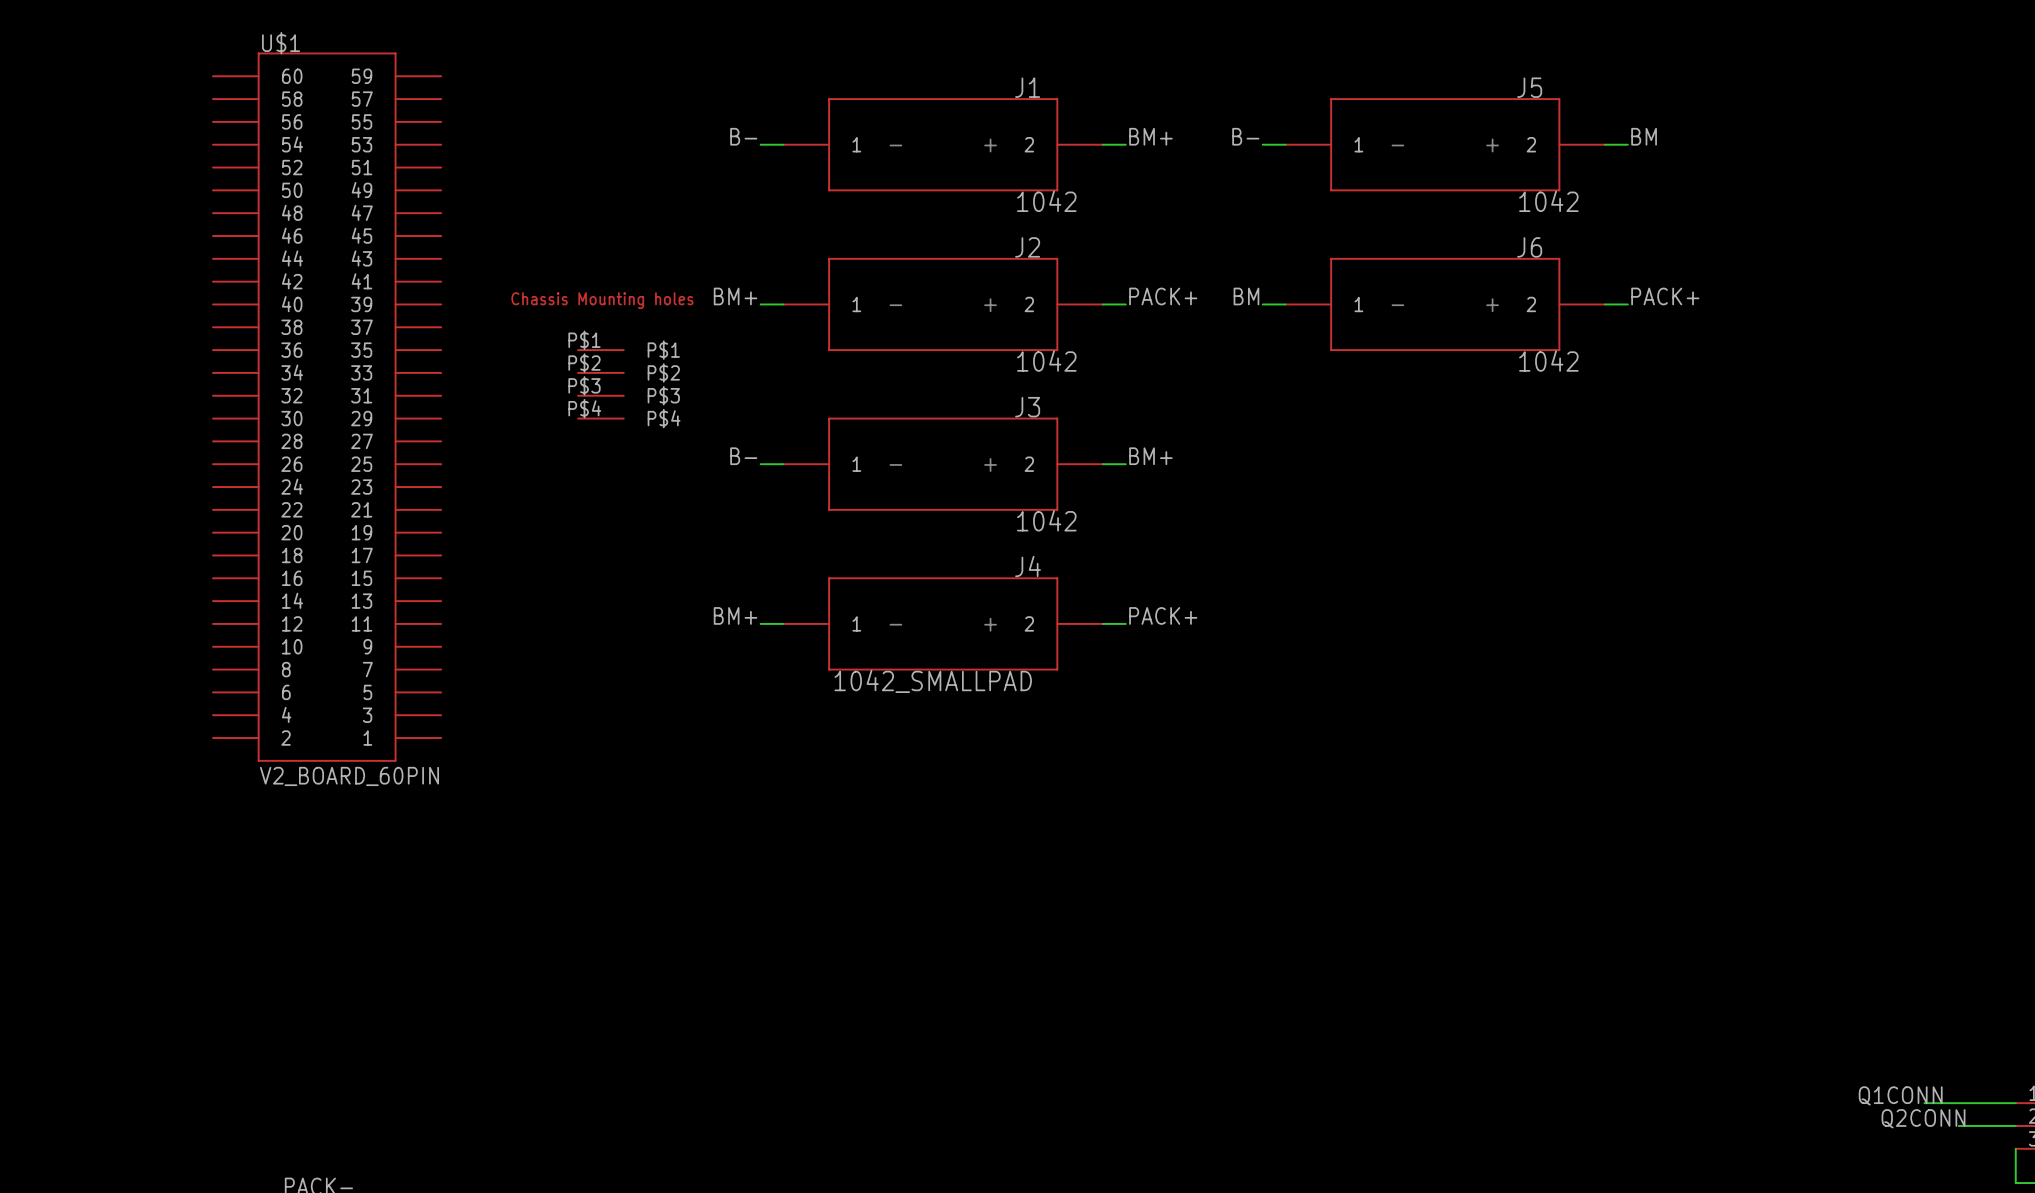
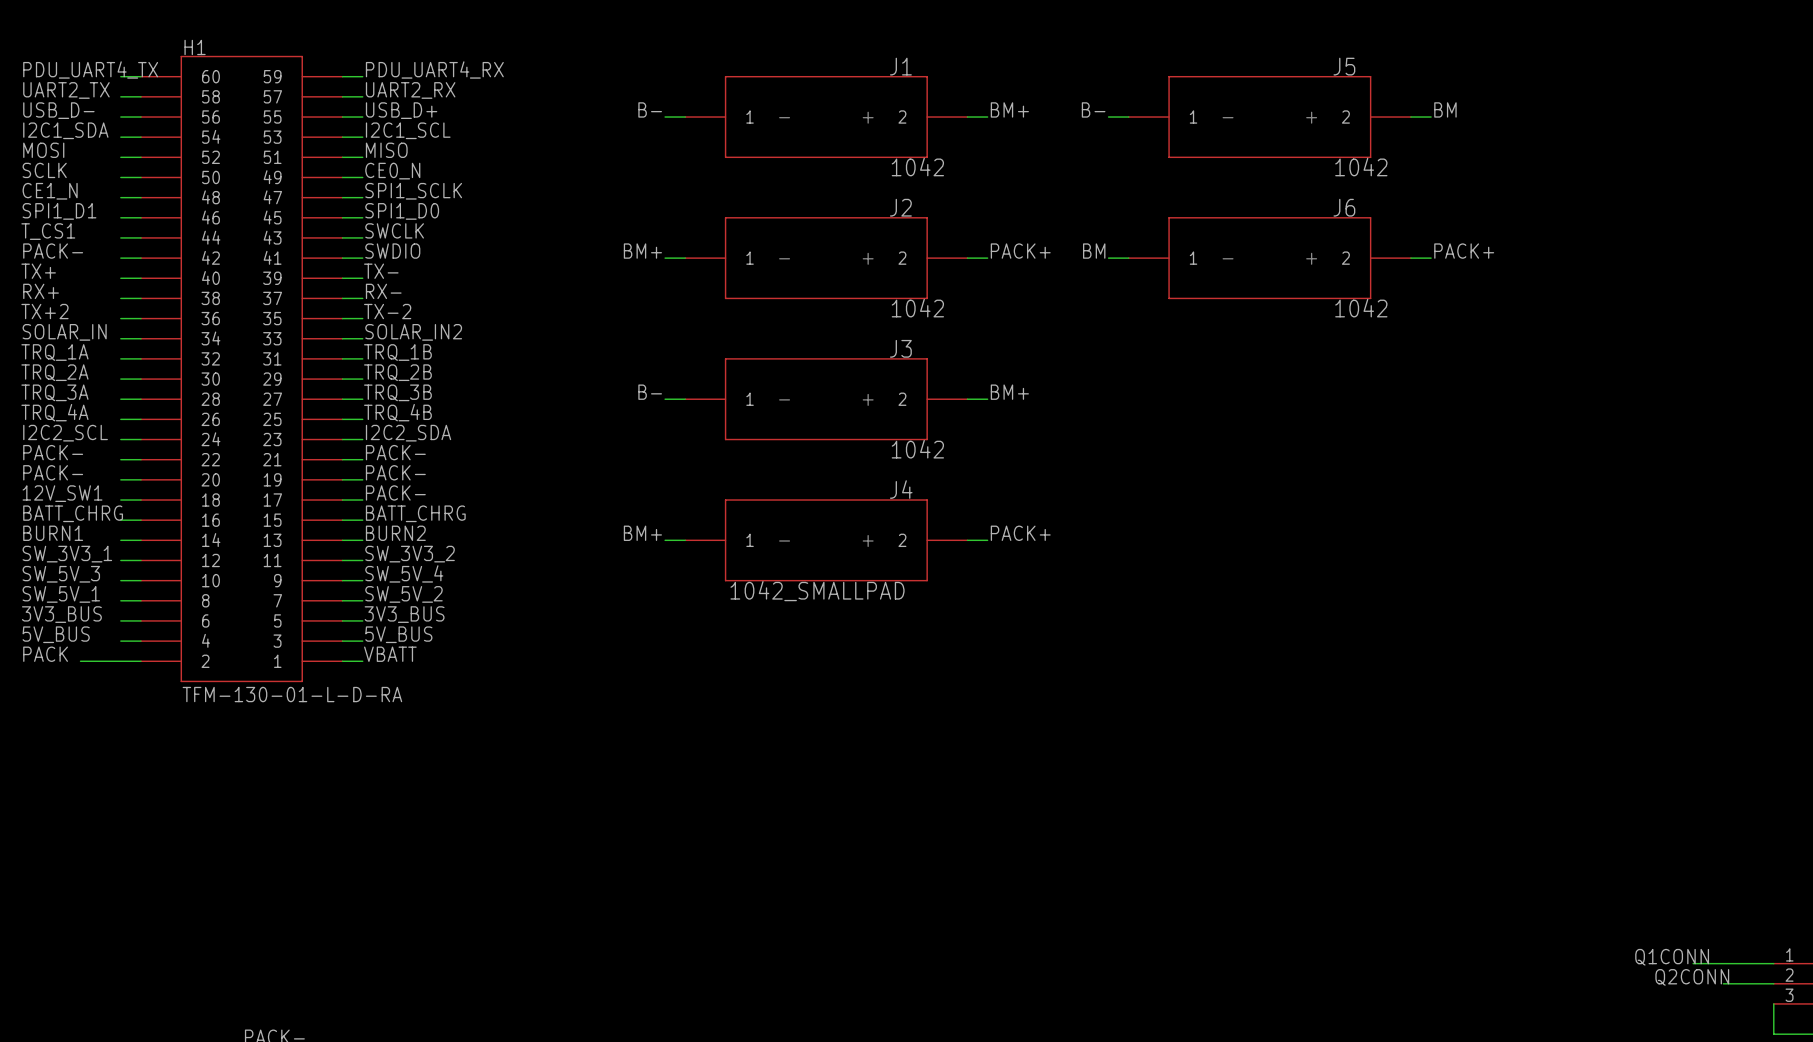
label: none -> PDU_UART4_TX (90, 69)
label: none -> PDU_UART4_RX (434, 69)
wire: none -> (120, 76) (140, 76)
label: none -> UART2_TX (66, 90)
label: none -> UART2_RX (410, 90)
wire: none -> (120, 96) (140, 96)
label: none -> USB_D- (58, 110)
label: none -> USB_D+ (401, 110)
wire: none -> (120, 117) (140, 117)
label: none -> I2C1_SDA (65, 130)
label: none -> I2C1_SCL (408, 130)
wire: none -> (120, 137) (140, 137)
label: none -> MOSI (43, 150)
label: none -> MISO (386, 150)
wire: none -> (120, 157) (140, 157)
label: none -> SCLK (44, 170)
label: none -> CE0_N (392, 171)
wire: none -> (120, 177) (140, 177)
label: none -> CE1_N (50, 191)
label: none -> SPI1_SCLK (413, 191)
wire: none -> (120, 197) (140, 197)
label: none -> SPI1_D1 (59, 211)
label: none -> SPI1_D0 (402, 211)
wire: none -> (120, 217) (140, 217)
label: none -> SWCLK (394, 230)
label: none -> T_CS1 (48, 231)
wire: none -> (120, 237) (140, 237)
label: none -> PACK- (53, 251)
label: none -> SWDIO (392, 251)
wire: none -> (120, 258) (140, 258)
label: none -> TX+ (38, 271)
label: none -> TX- (381, 271)
wire: none -> (120, 278) (140, 278)
label: none -> RX+ (41, 291)
label: none -> RX- (383, 291)
wire: none -> (120, 298) (140, 298)
label: none -> TX+2 (44, 311)
label: none -> TX-2 (387, 311)
wire: none -> (120, 318) (140, 318)
label: none -> SOLAR_IN (64, 332)
label: none -> SOLAR_IN2 (413, 332)
wire: none -> (120, 338) (140, 338)
U$1: V2_BOARD_60PIN (418, 407) -> none
label: none -> TRQ_1A (54, 352)
label: none -> TRQ_1B (397, 352)
wire: none -> (120, 358) (140, 358)
H1: none -> TFM-130-01-L-D-RA (241, 368)
label: none -> TRQ_2A (54, 372)
label: none -> TRQ_2B (397, 372)
wire: none -> (120, 379) (140, 379)
label: none -> TRQ_3A (54, 392)
label: none -> TRQ_3B (397, 392)
wire: none -> (120, 399) (140, 399)
label: none -> TRQ_4A (54, 412)
label: none -> TRQ_4B (397, 412)
wire: none -> (120, 419) (140, 419)
label: none -> I2C2_SCL (65, 433)
label: none -> I2C2_SDA (408, 433)
wire: none -> (120, 439) (140, 439)
label: none -> PACK- (53, 452)
label: none -> PACK- (395, 452)
wire: none -> (120, 459) (140, 459)
label: none -> PACK- (53, 472)
label: none -> PACK- (395, 472)
wire: none -> (120, 479) (140, 479)
label: none -> PACK- (395, 492)
label: none -> 12V_SW1 (62, 493)
wire: none -> (120, 500) (140, 500)
label: none -> BATT_CHRG (73, 513)
label: none -> BATT_CHRG (415, 513)
wire: none -> (120, 520) (140, 520)
label: none -> BURN1 (53, 533)
label: none -> BURN2 (395, 533)
wire: none -> (120, 540) (140, 540)
label: none -> SW_3V3_1 (67, 554)
label: none -> SW_3V3_2 (410, 554)
wire: none -> (120, 560) (140, 560)
label: none -> SW_5V_4 (404, 573)
label: none -> SW_5V_3 (61, 574)
wire: none -> (120, 580) (140, 580)
label: none -> SW_5V_1 (61, 594)
label: none -> SW_5V_2 (403, 594)
wire: none -> (120, 600) (140, 600)
label: none -> 3V3_BUS (61, 614)
label: none -> 3V3_BUS (404, 614)
wire: none -> (120, 620) (140, 620)
label: none -> 5V_BUS (56, 634)
label: none -> 5V_BUS (398, 634)
wire: none -> (120, 641) (140, 641)
label: none -> PACK (45, 654)
label: none -> VBATT (390, 654)
wire: none -> (80, 661) (140, 661)
wire: none -> (342, 661) (362, 661)

